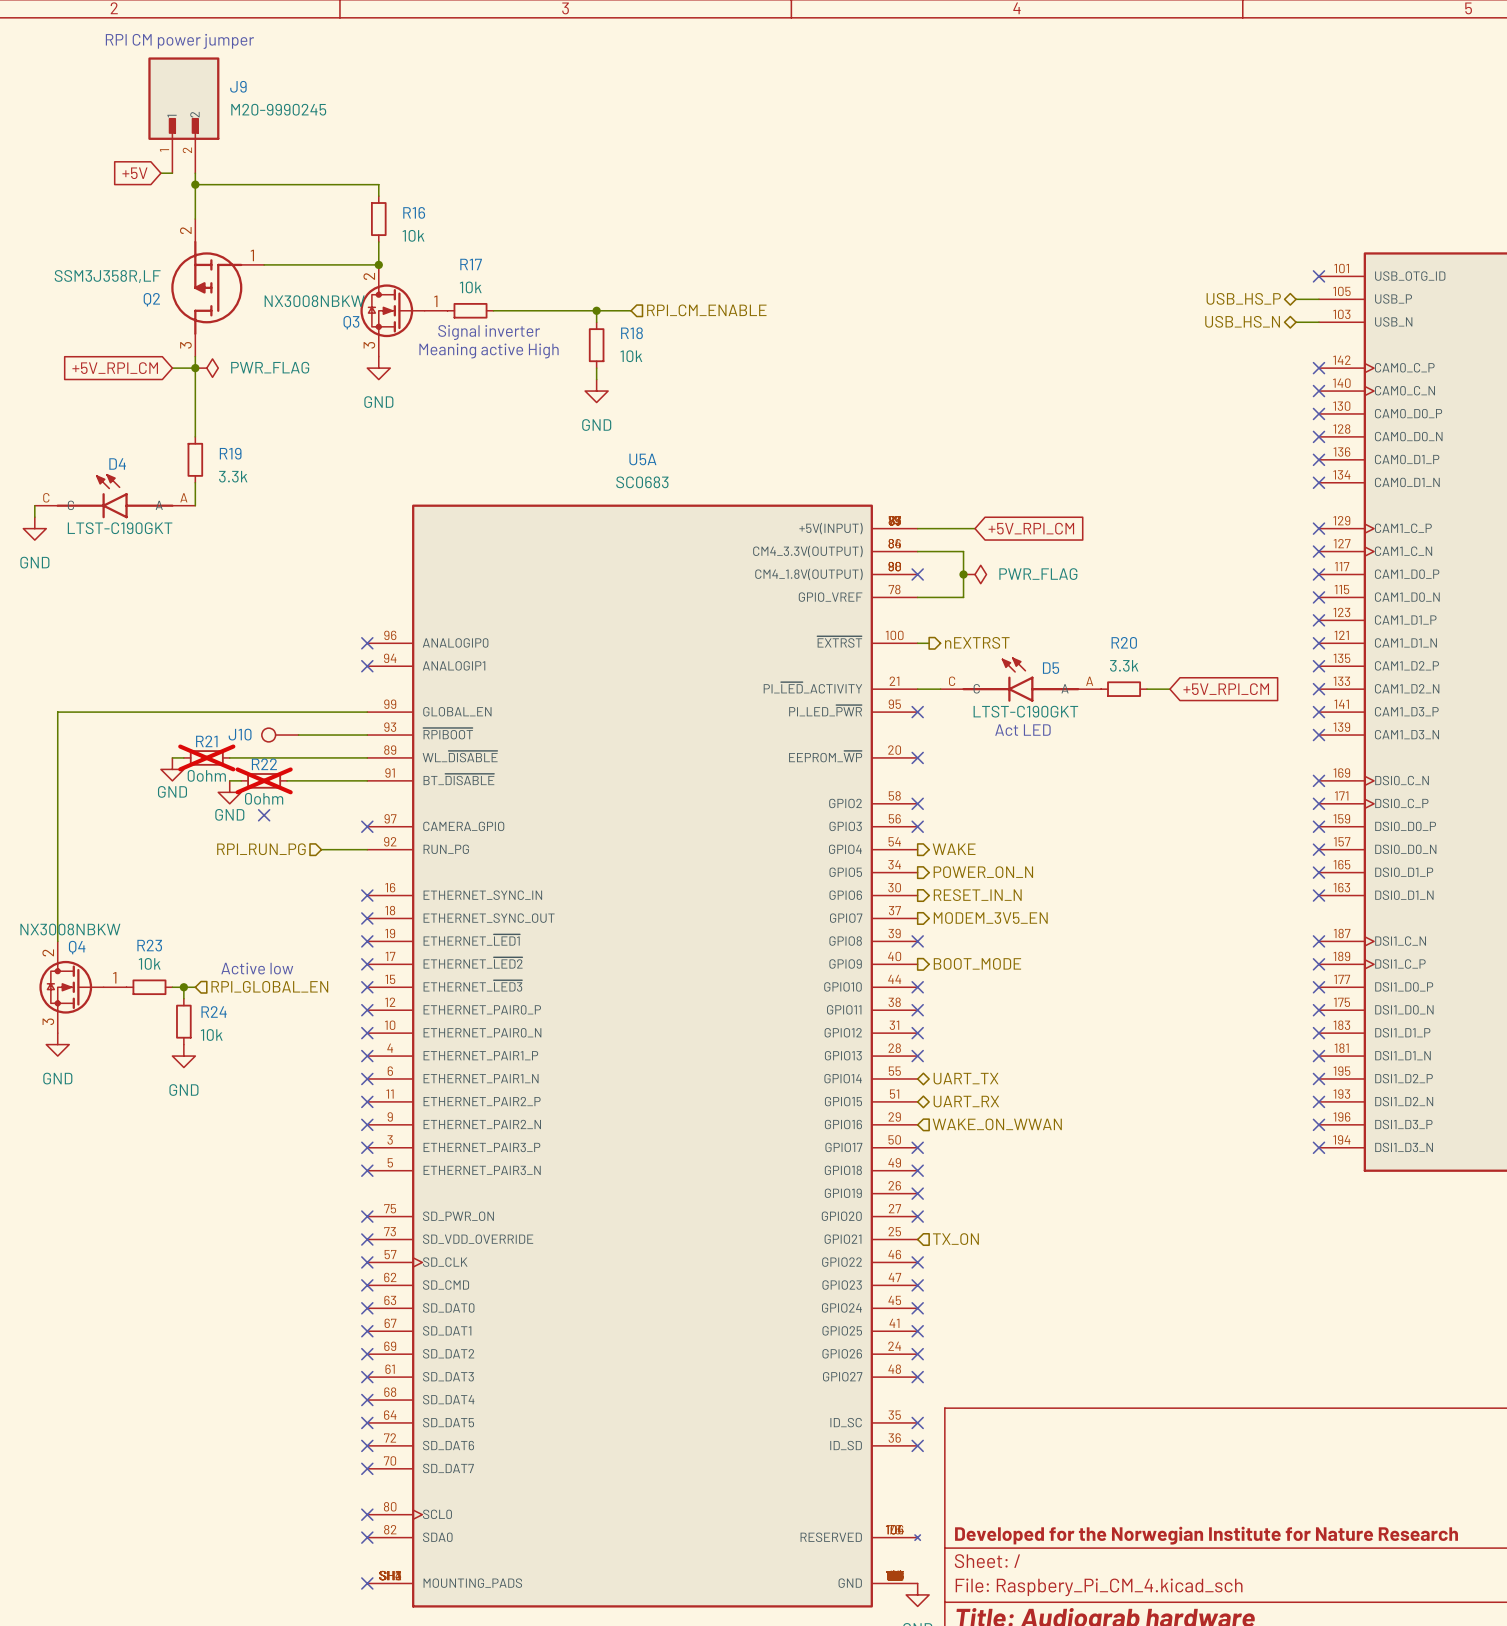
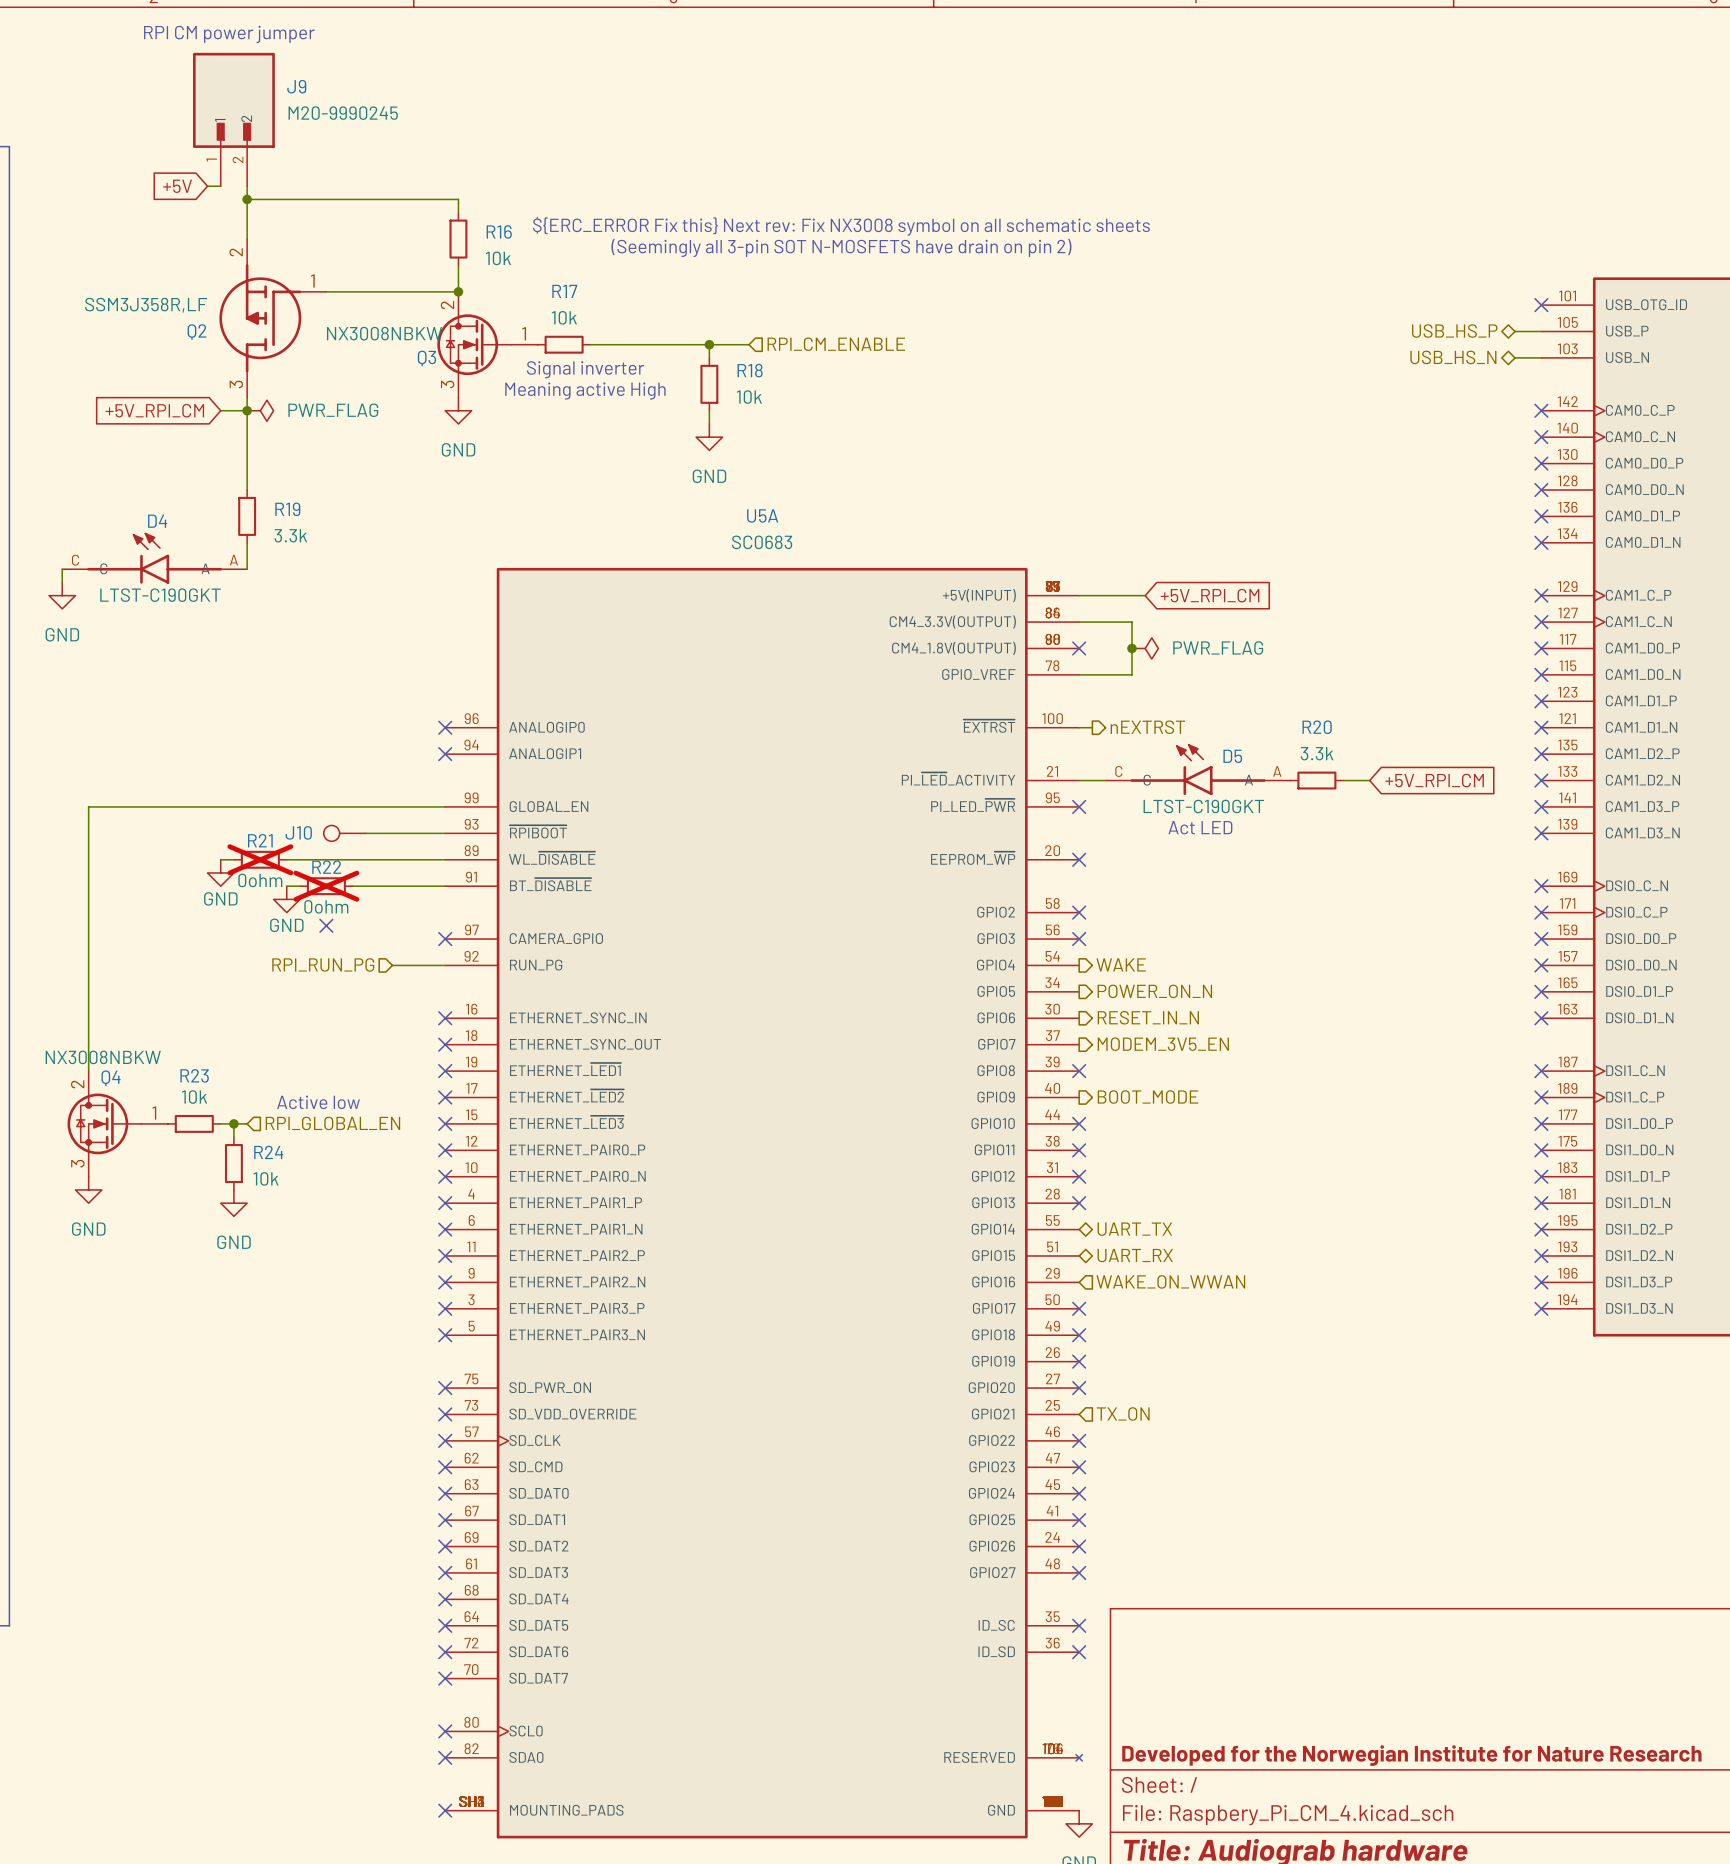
text: none -> ${ERC_ERROR Fix this} Next rev: Fix NX3008 symbol on all schematic sheets (841, 226)
text: none -> (Seemingly all 3-pin SOT N-MOSFETS have drain on pin 2) (841, 247)

